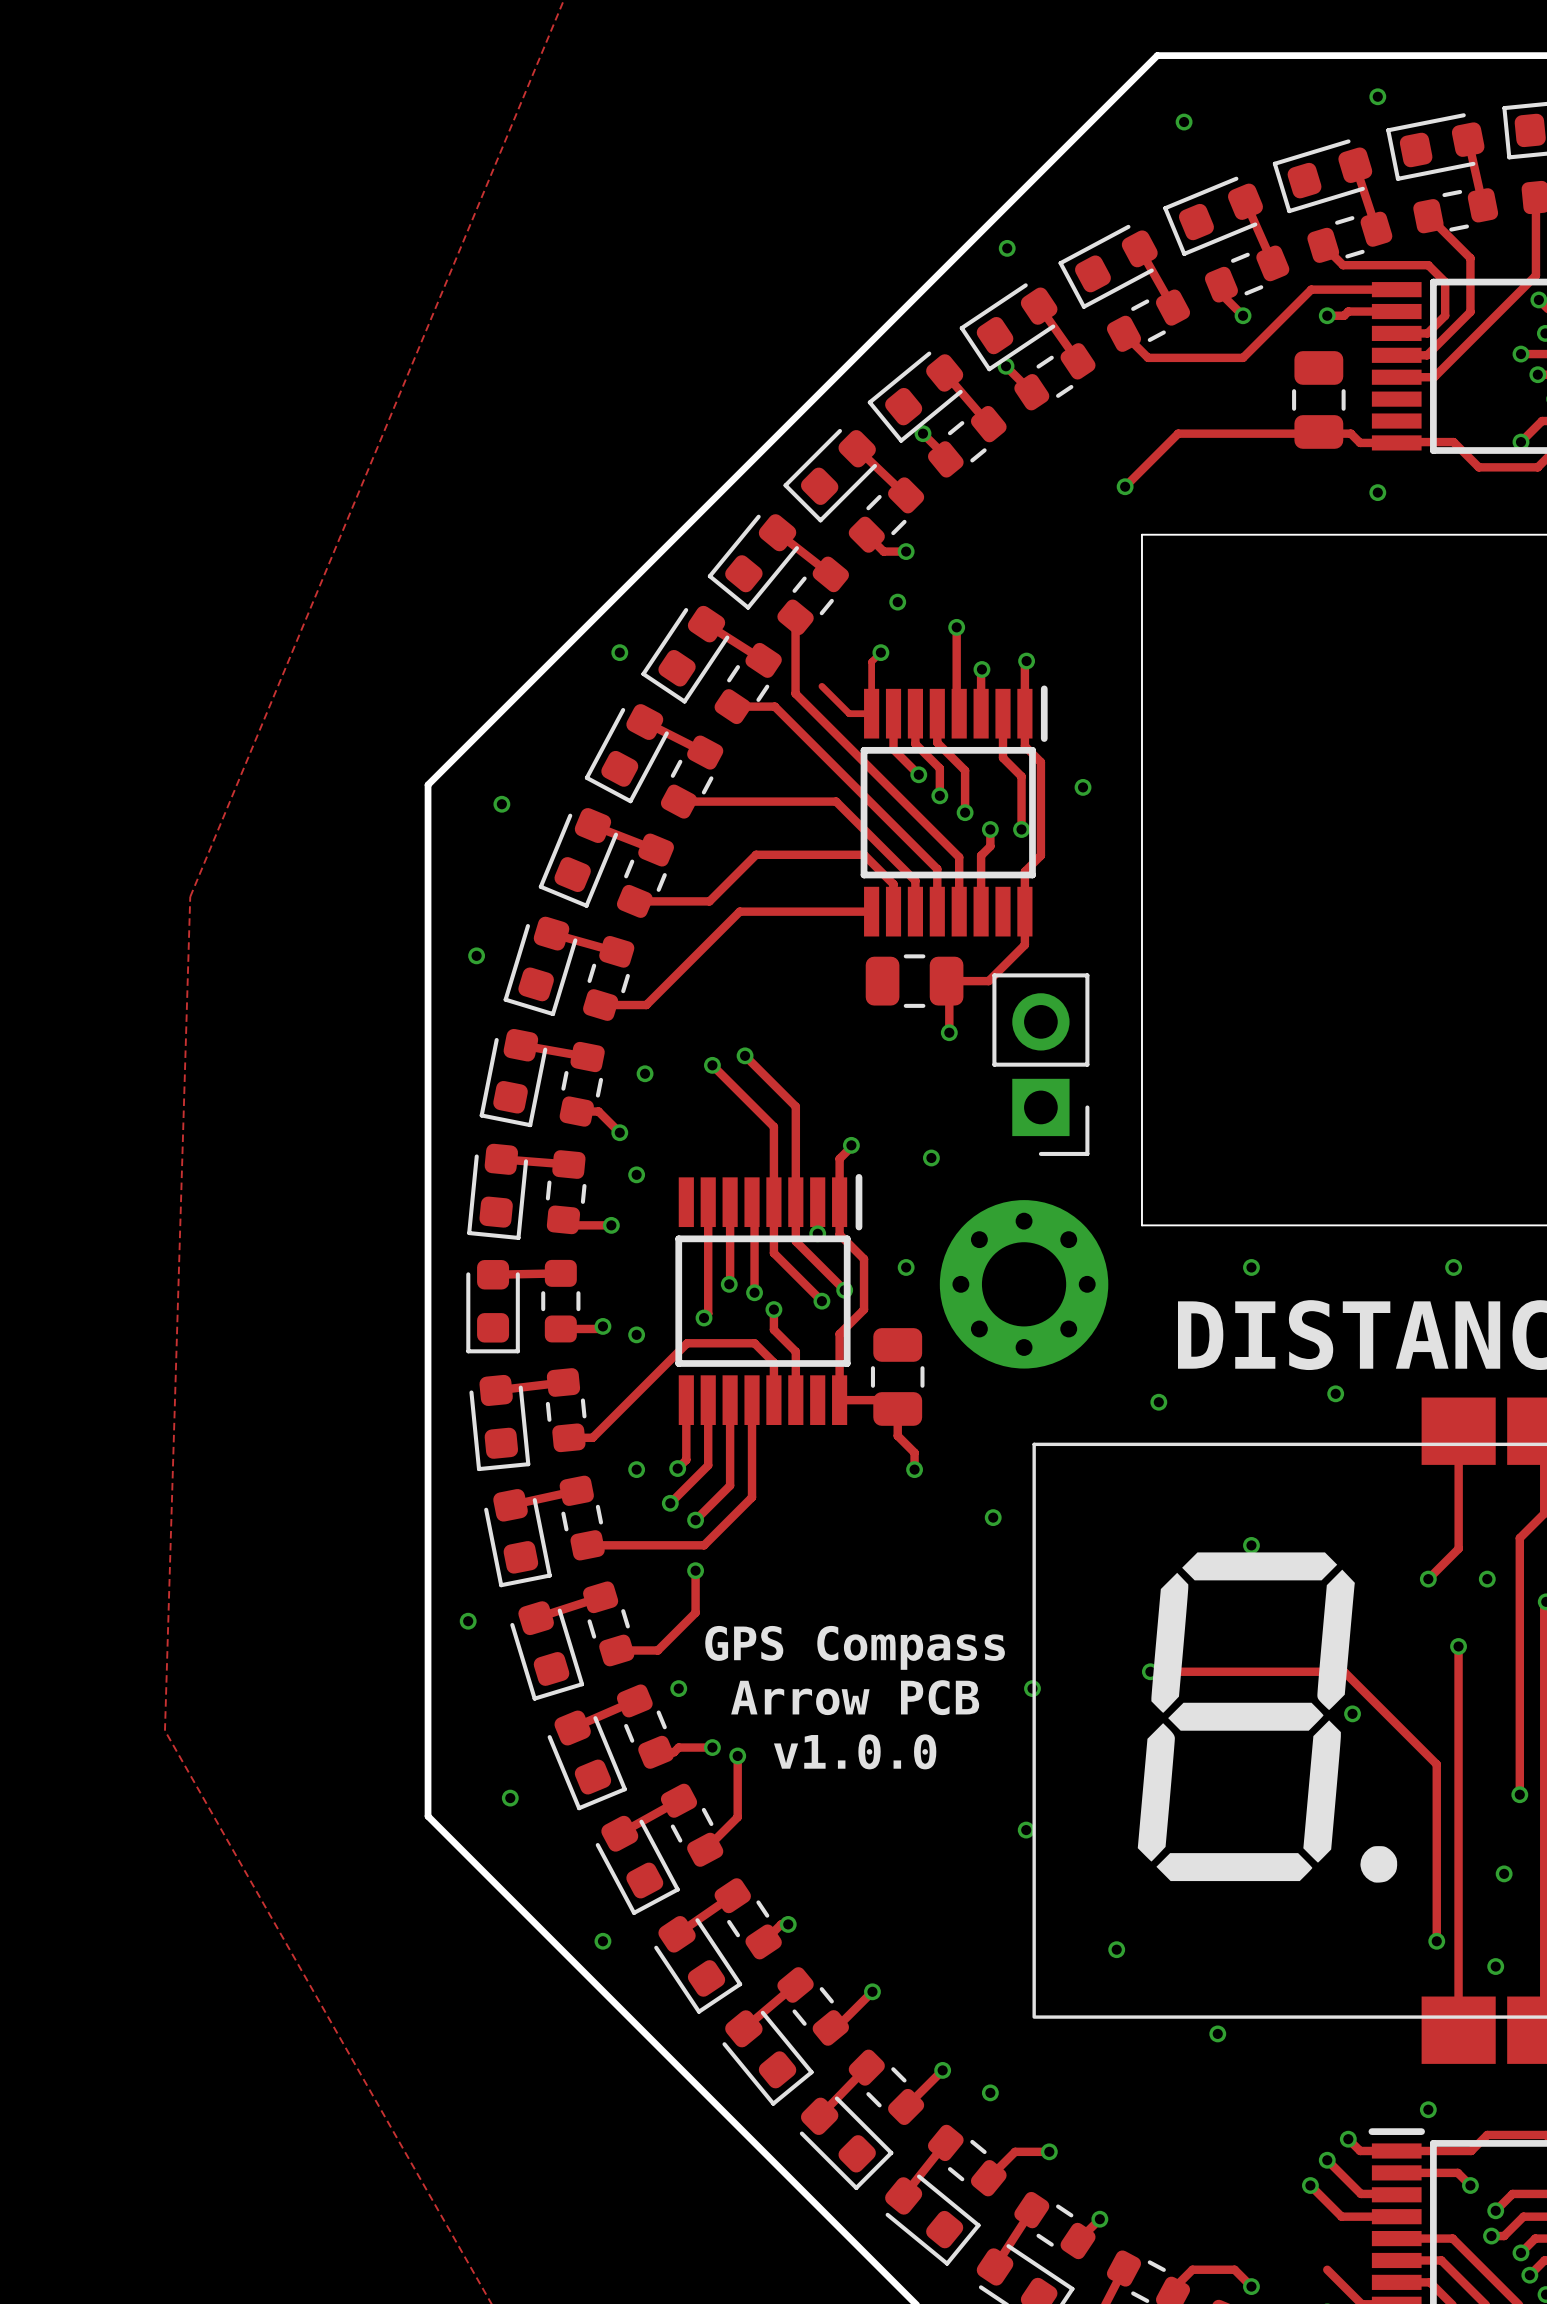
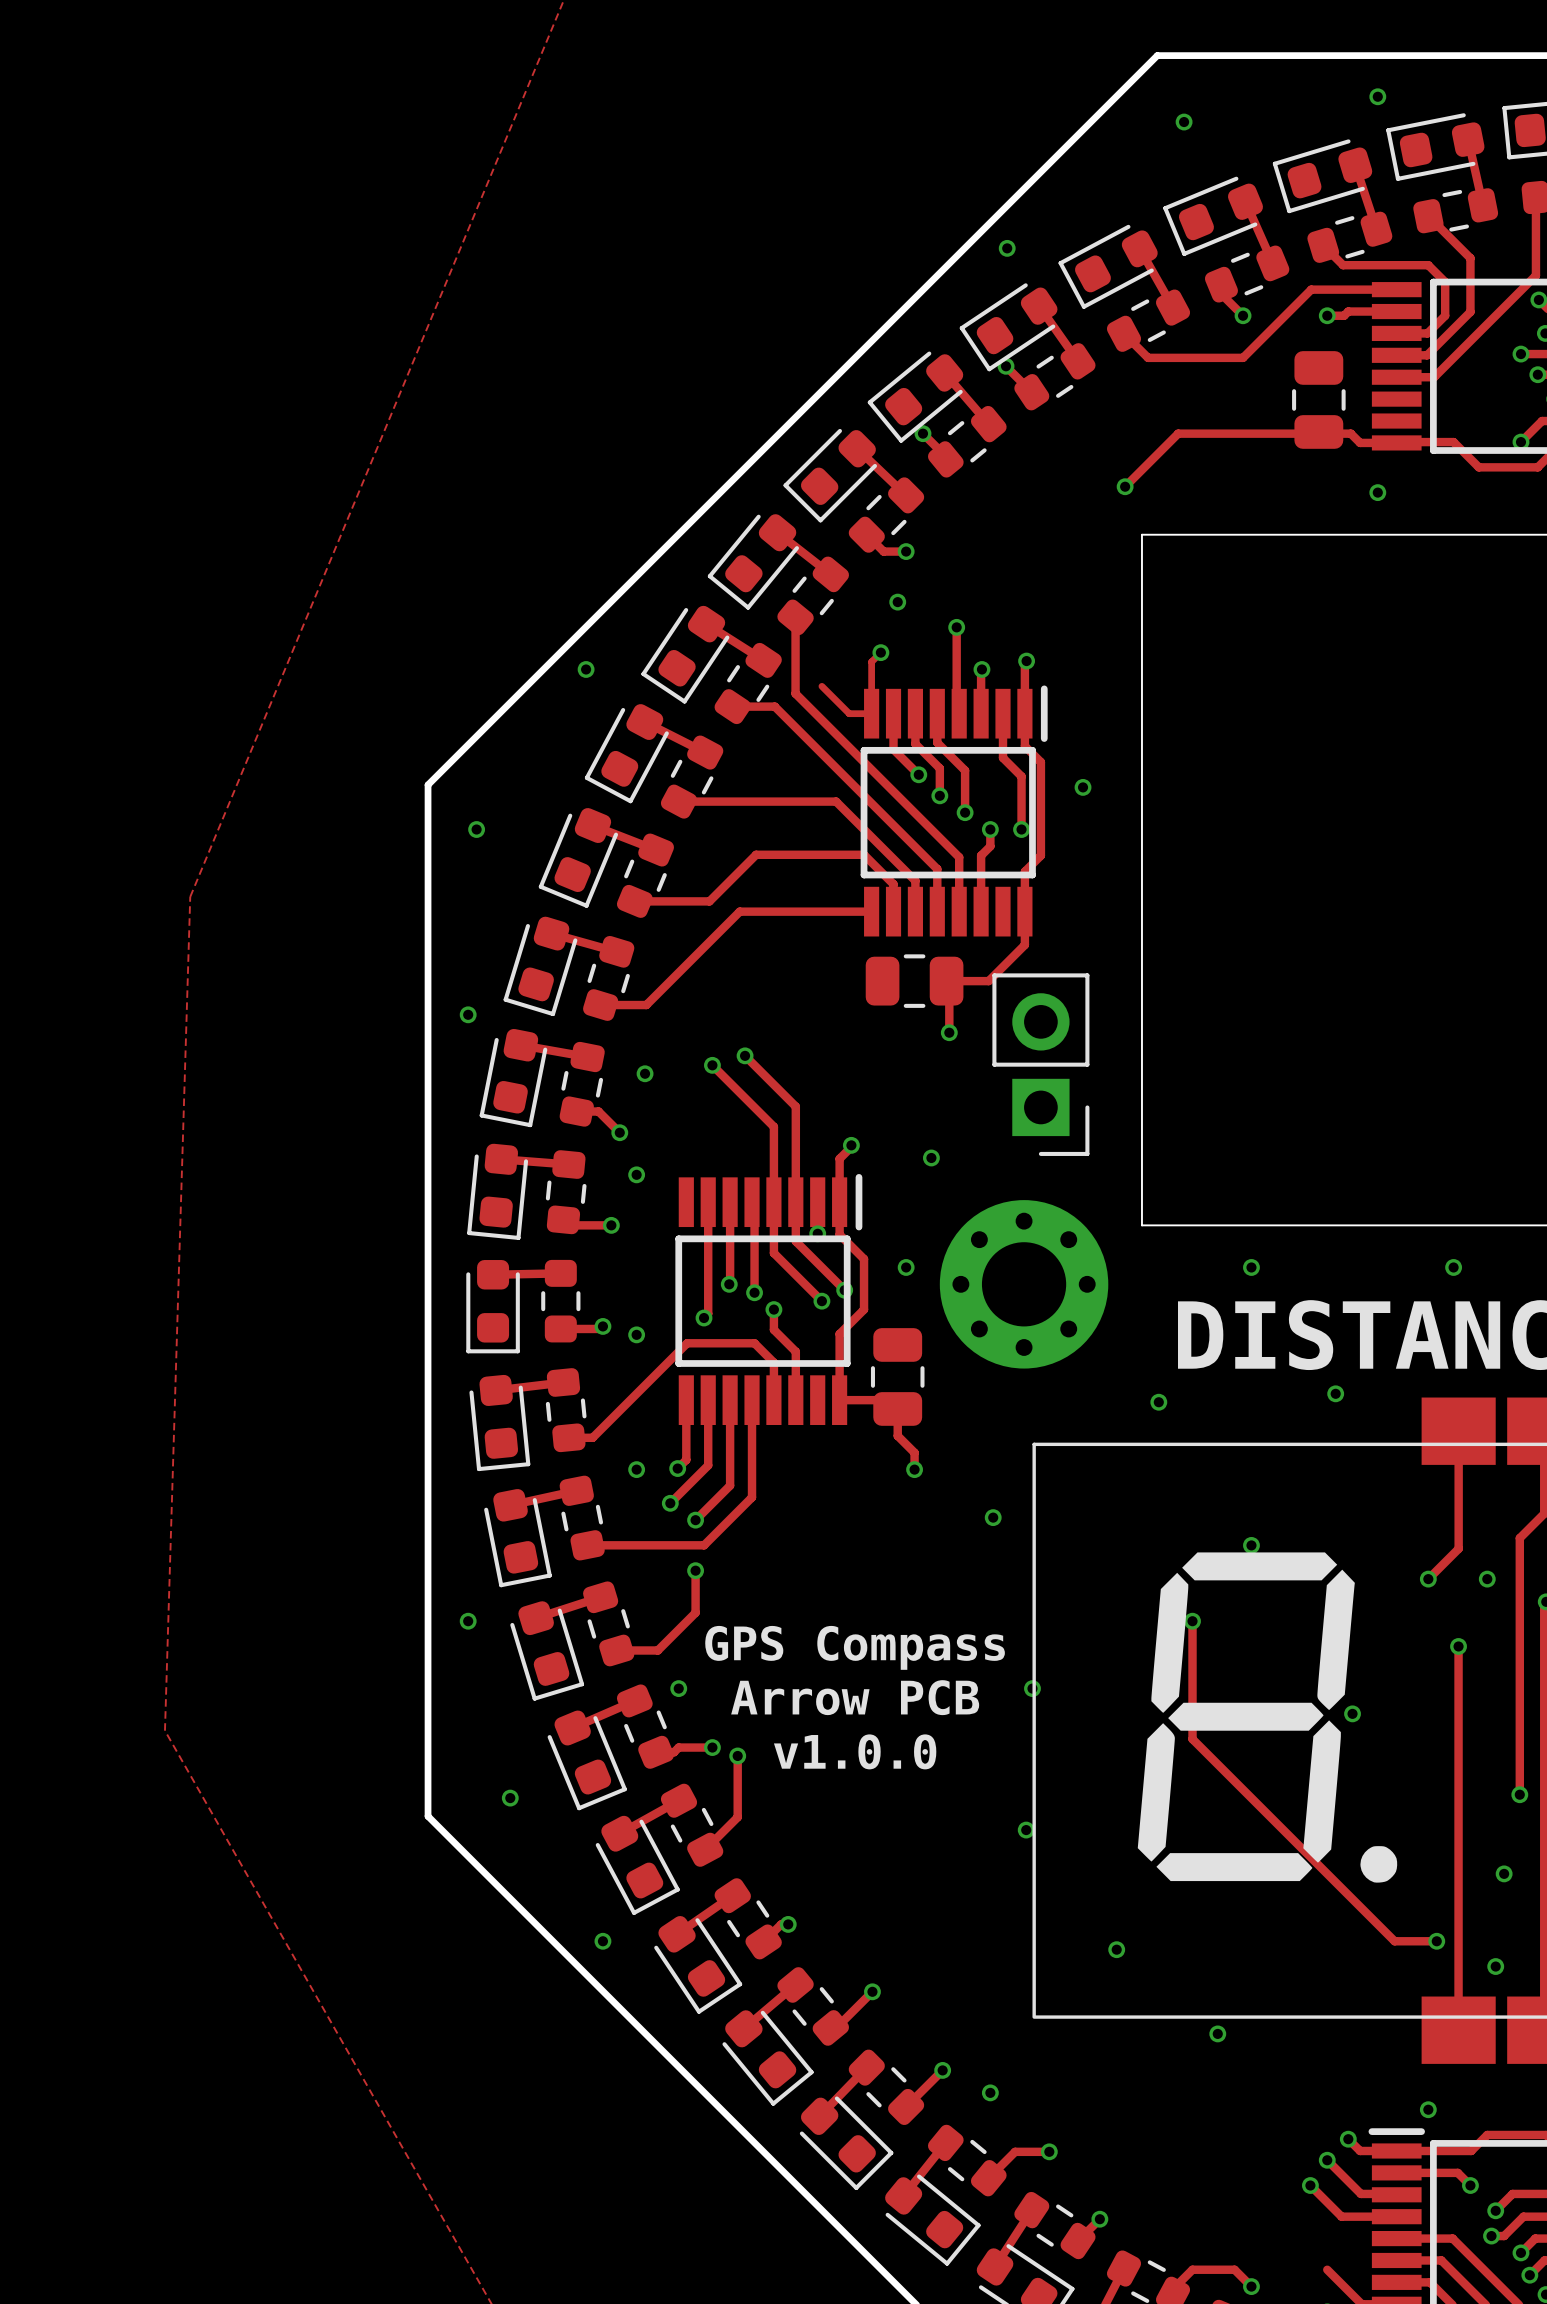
via position: (619, 652) -> (586, 669)
via position: (501, 804) -> (476, 829)
via position: (476, 955) -> (468, 1014)
track: (1150, 1671) (1344, 1671) (1436, 1764) (1436, 1941) -> (1192, 1621) (1192, 1739) (1394, 1941) (1436, 1941)
via position: (1150, 1671) -> (1192, 1621)

